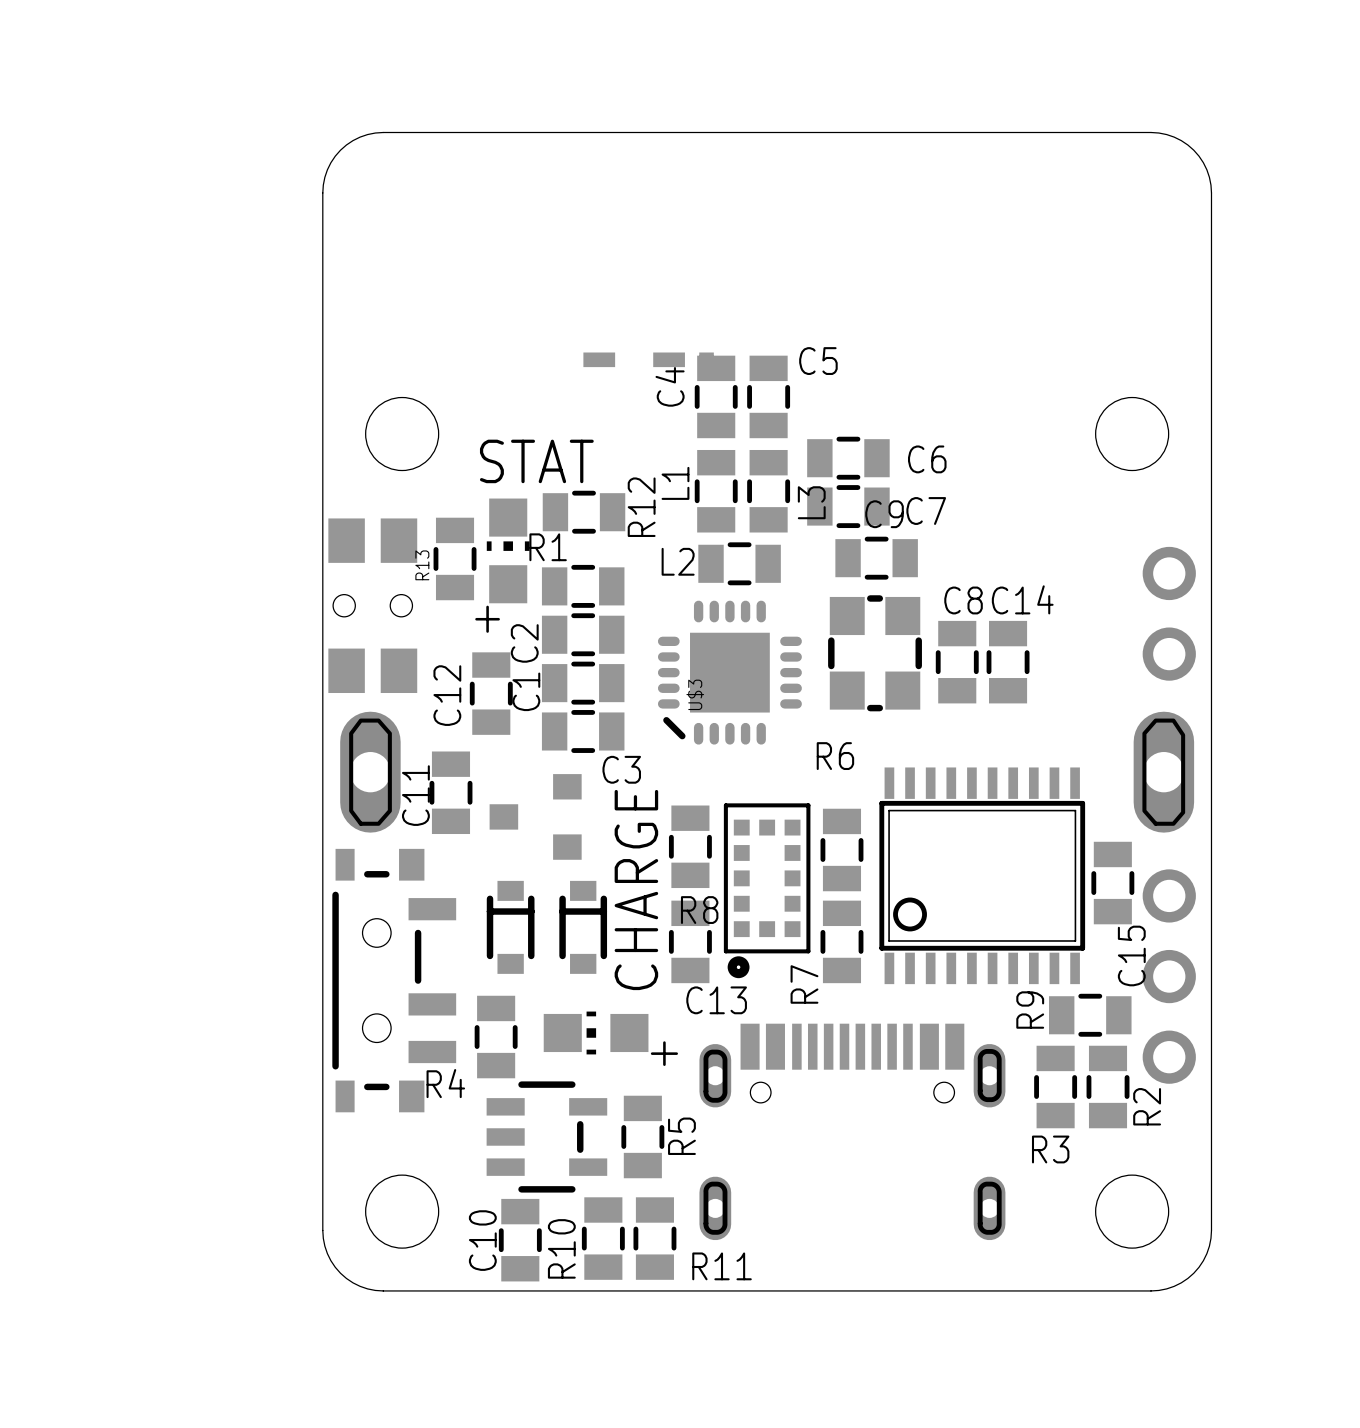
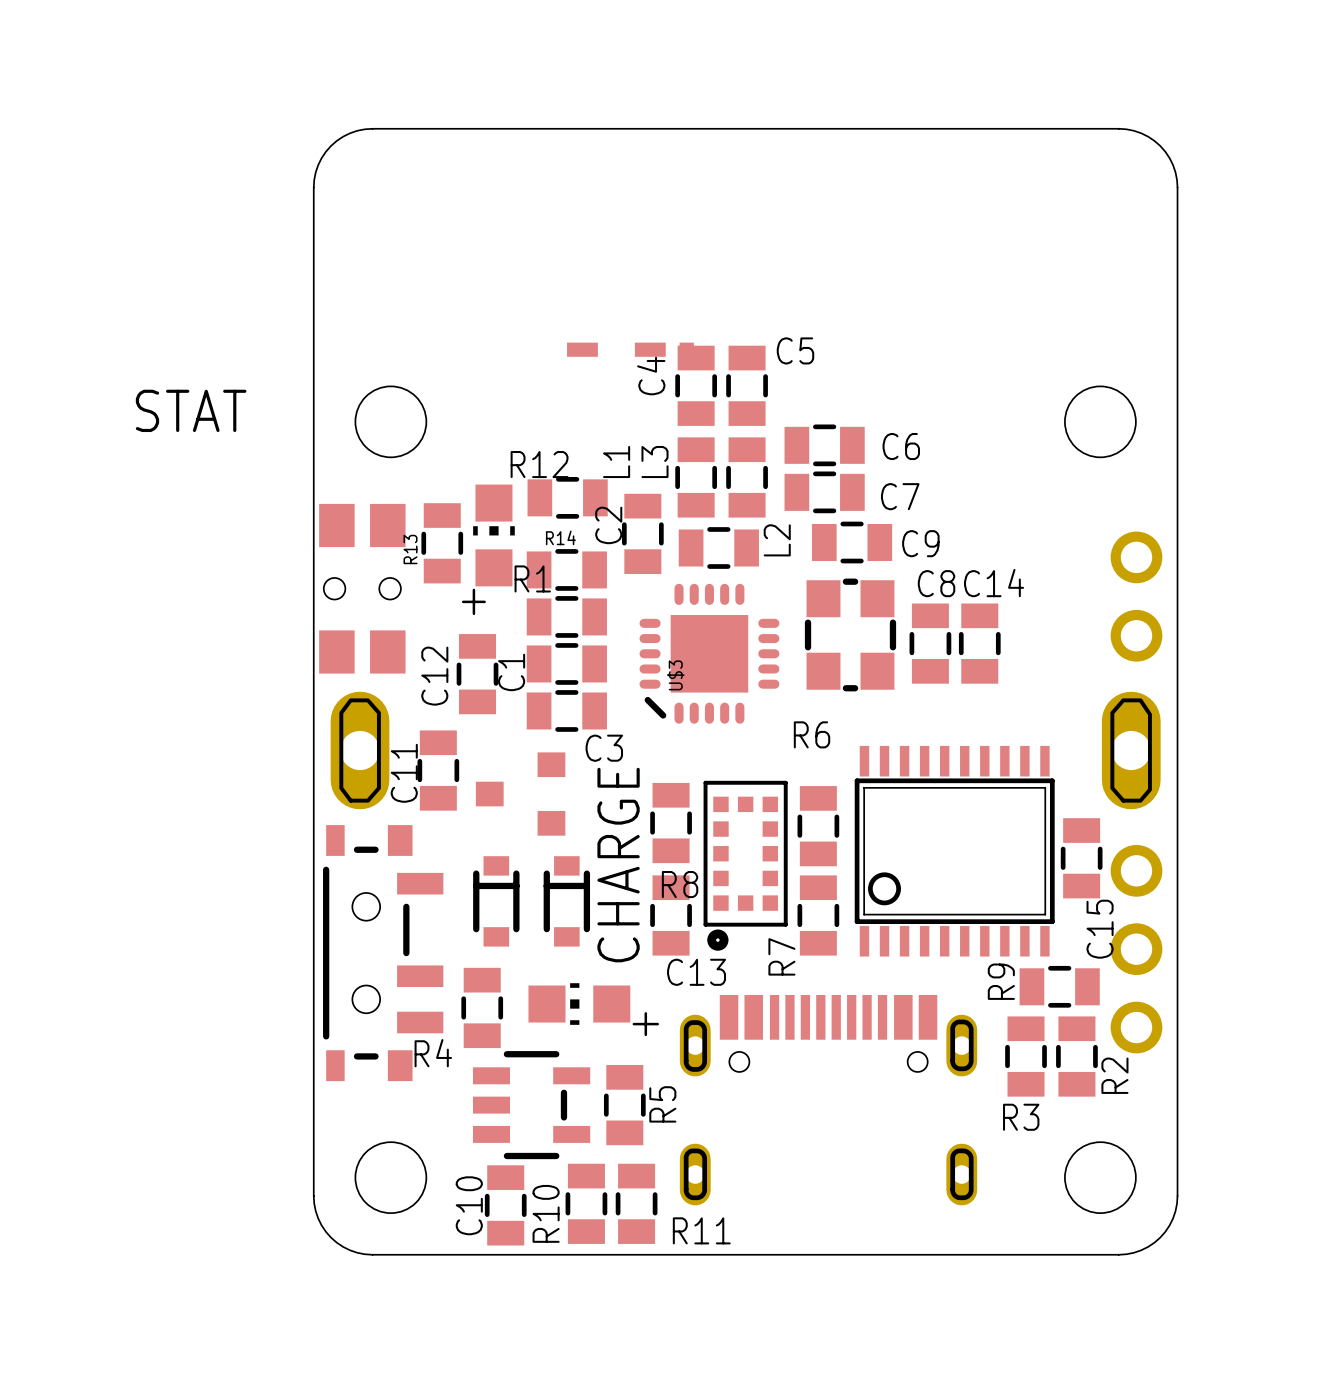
text position: STAT (536, 461) -> STAT (191, 410)
L1 name position: L1 (675, 483) -> L1 (616, 462)
L3 name position: L3 (811, 502) -> L3 (654, 462)
R12 name rotation: 0° (641, 507) -> 90° clockwise (539, 464)
R12 name position: R12 (641, 507) -> R12 (539, 464)
C9 name position: C9 (884, 514) -> C9 (920, 543)
R1 name: R1 (548, 547) -> R14 (560, 537)
C2: none -> (642, 533)
L2 name rotation: 0° (678, 561) -> 90° counterclockwise (777, 540)
L2 name position: L2 (678, 561) -> L2 (777, 540)
C2 name: C2 (524, 643) -> R1 (532, 578)

